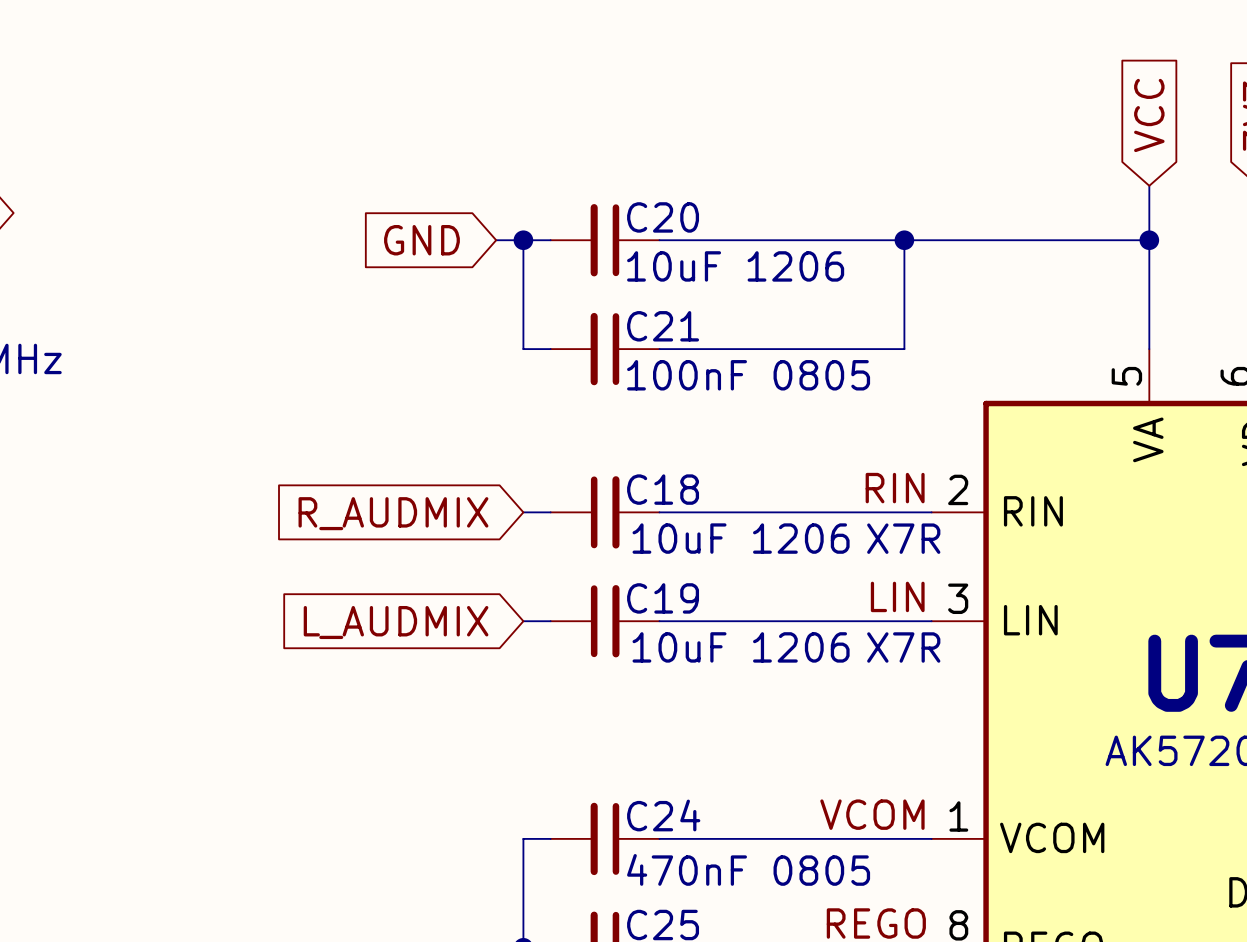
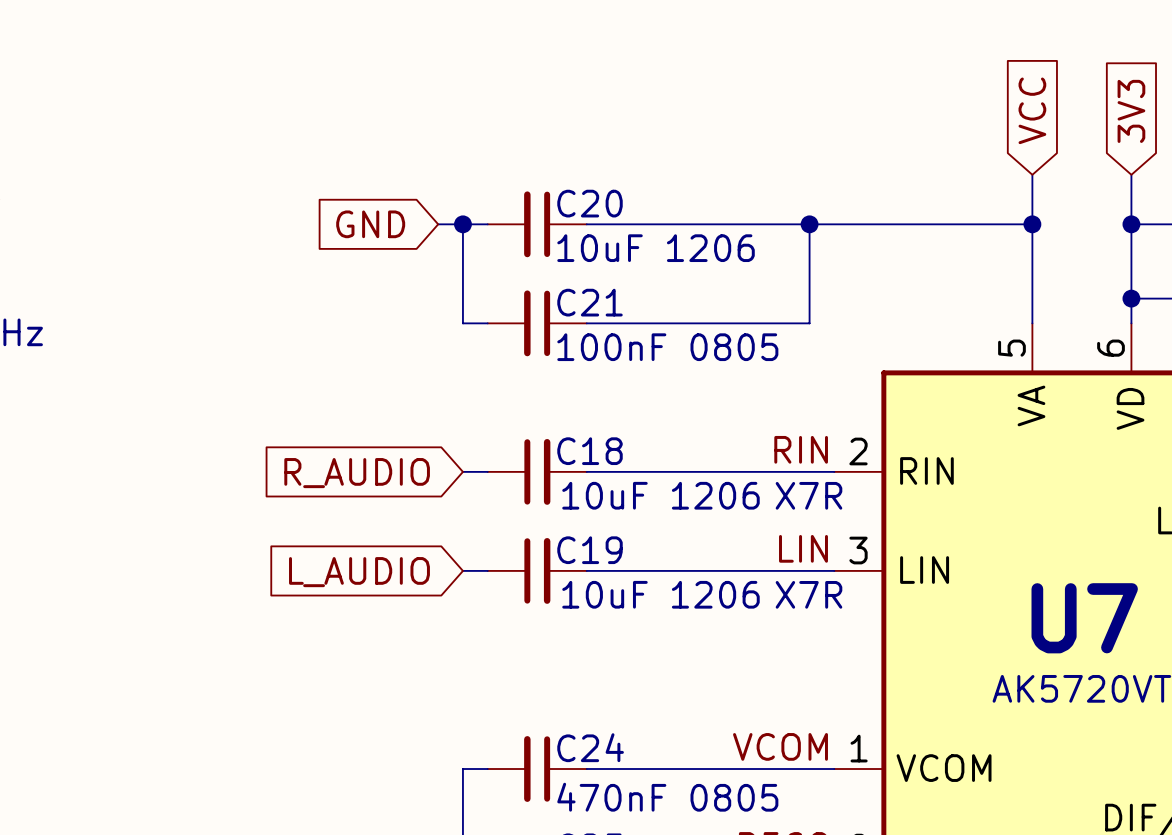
global label: R_AUDMIX (393, 513) -> R_AUDIO (357, 473)
global label: L_AUDMIX (396, 622) -> L_AUDIO (359, 572)

